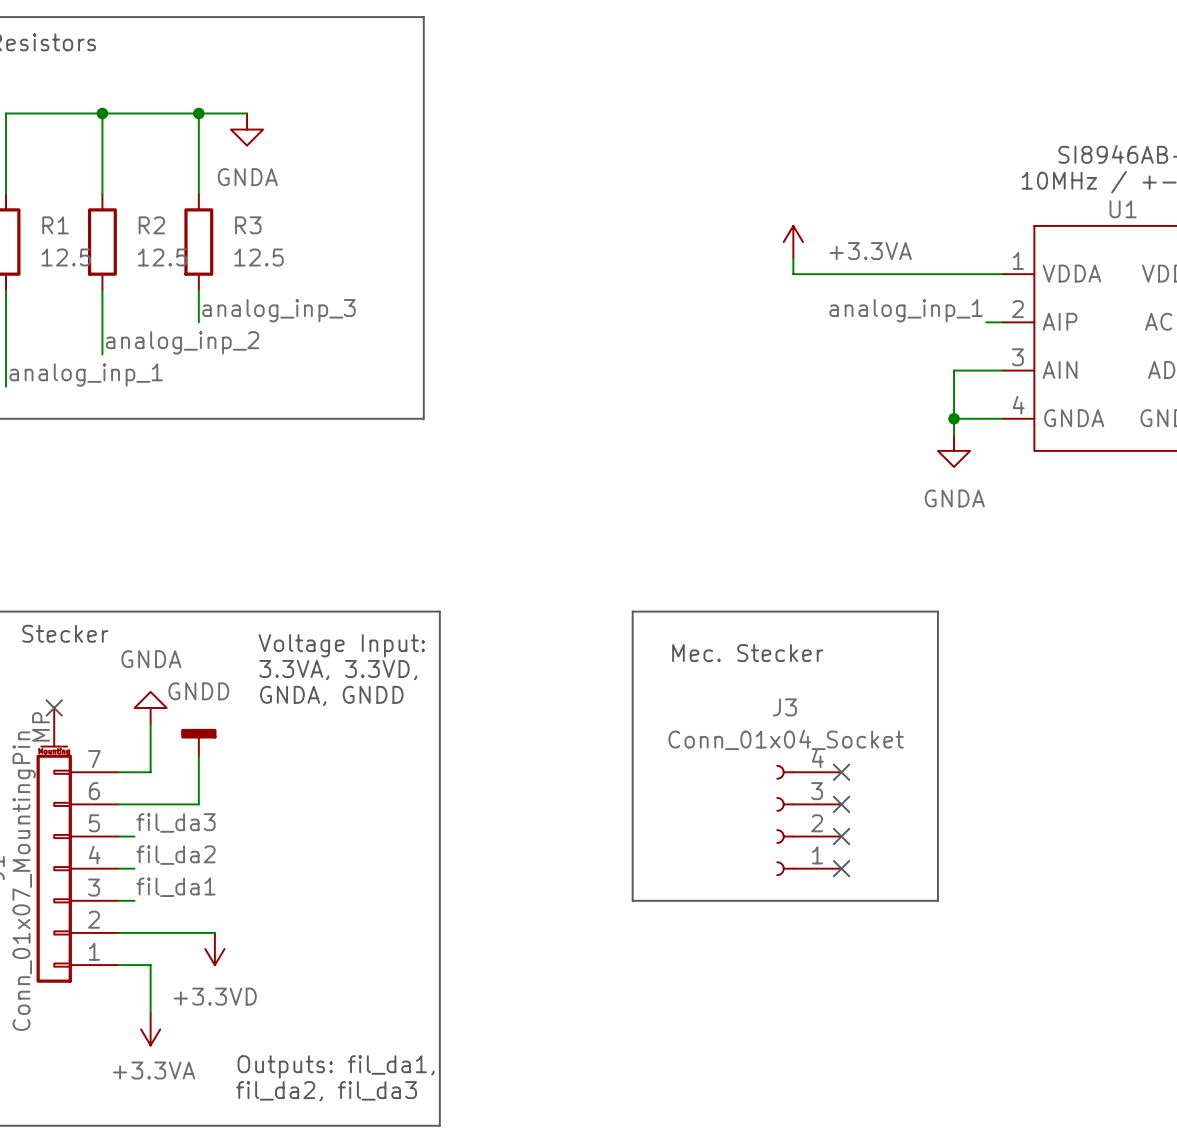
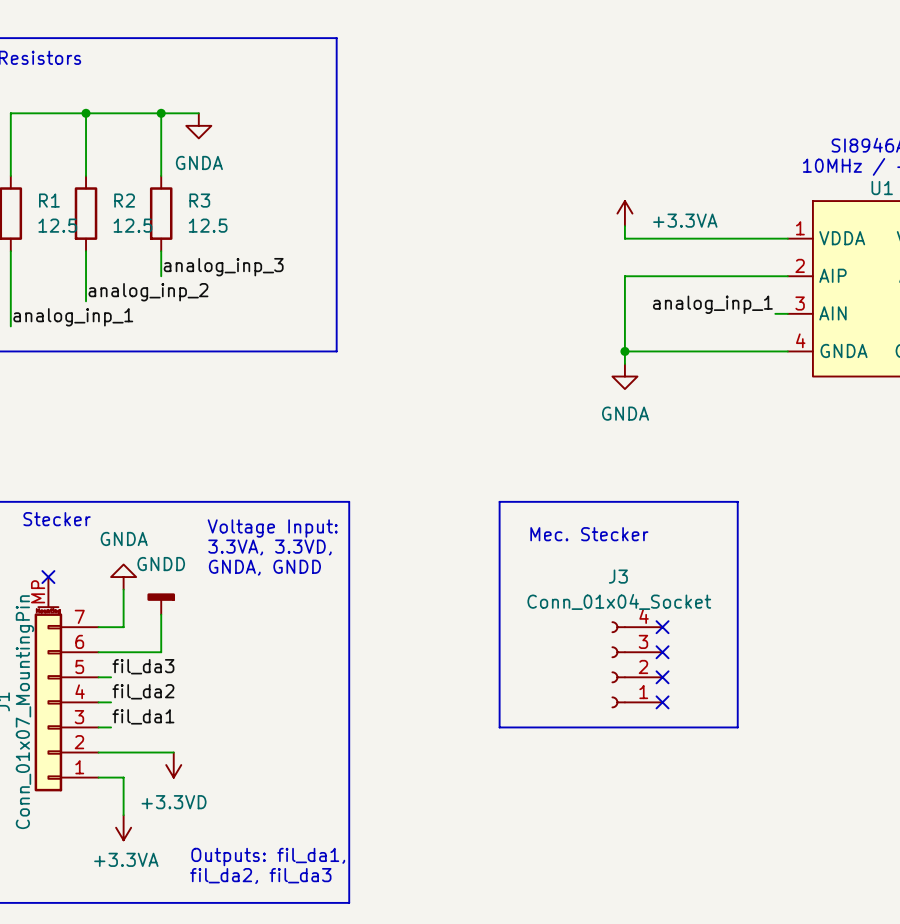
label position: analog_inp_1 (906, 310) -> analog_inp_1 (712, 304)
wire: none -> (775, 276) (624, 276) (624, 363)
wire: (986, 370) (954, 370) (954, 434) -> none
wire: none -> (624, 351) (750, 351)
junction: none -> (624, 351)
junction: (954, 418) -> none
power symbol position: GNDA (954, 450) -> GNDA (624, 376)

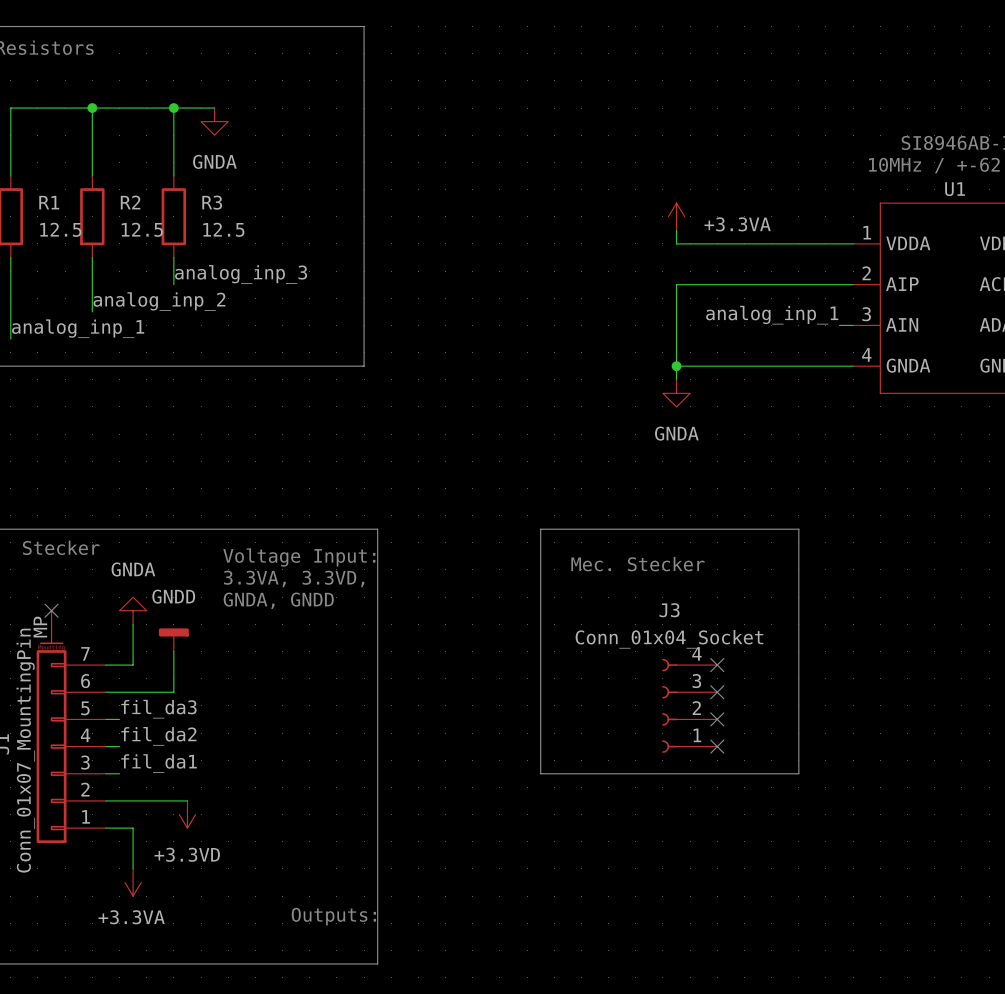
text: Outputs: fil_da1, (268, 857) -> Outputs: (333, 916)
text: fil_da2, fil_da3 (260, 875) -> none

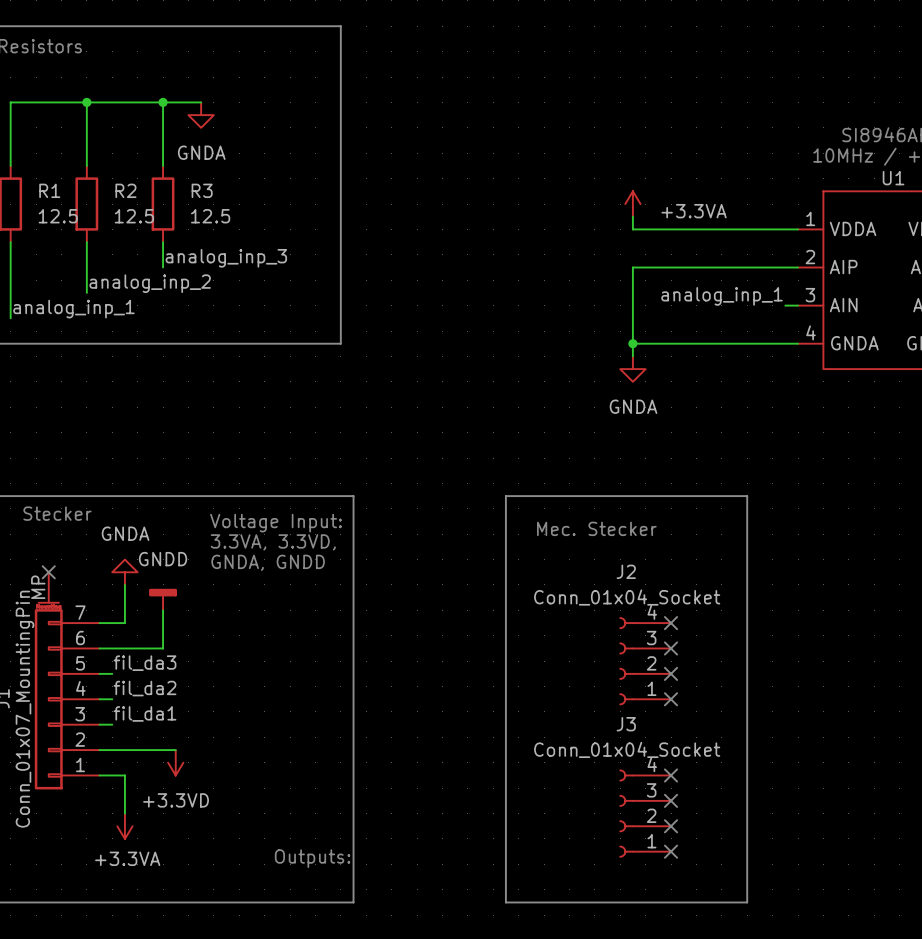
J3 name: J3 (669, 610) -> J2 (626, 571)
line: (540, 773) (798, 773) -> (505, 724) (505, 902) (747, 902) (747, 724)
no-connect mark: none -> (671, 775)
no-connect mark: none -> (671, 800)
J3: none -> Conn_01x04_Socket (645, 813)
no-connect mark: none -> (671, 826)
no-connect mark: none -> (671, 851)

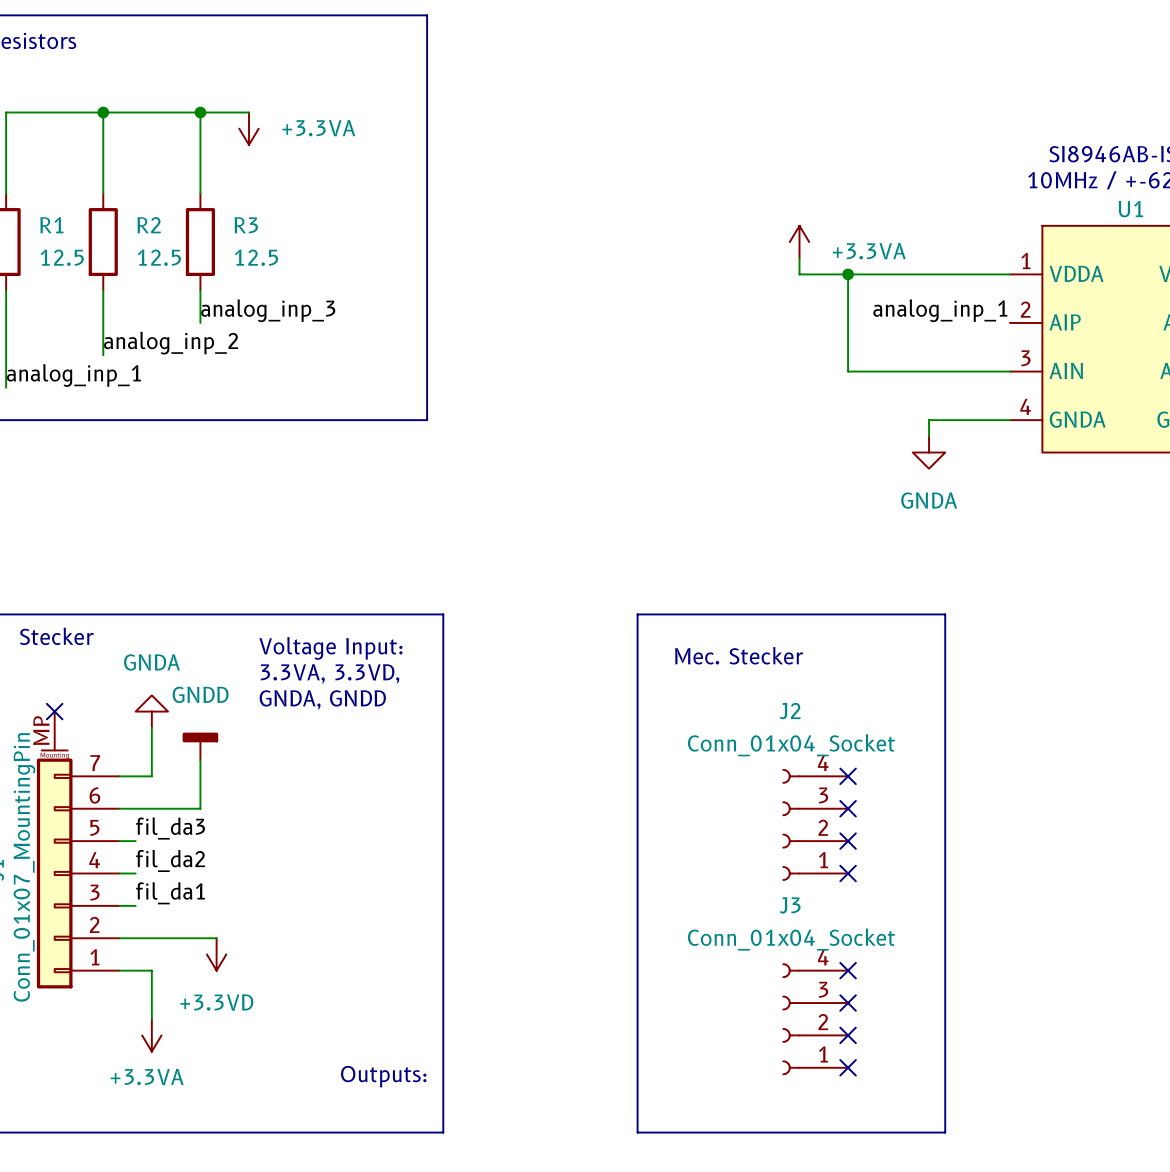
power symbol: GNDA (201, 115) -> +3.3VA (248, 128)
wire: none -> (848, 274) (848, 371) (993, 371)
junction: none -> (848, 274)
wire: (798, 267) (632, 267) (632, 356) -> none
label position: analog_inp_1 (722, 296) -> analog_inp_1 (940, 310)
wire: (632, 343) (734, 343) -> (929, 436) (929, 420)
junction: (632, 343) -> none
power symbol position: GNDA (632, 369) -> GNDA (929, 452)

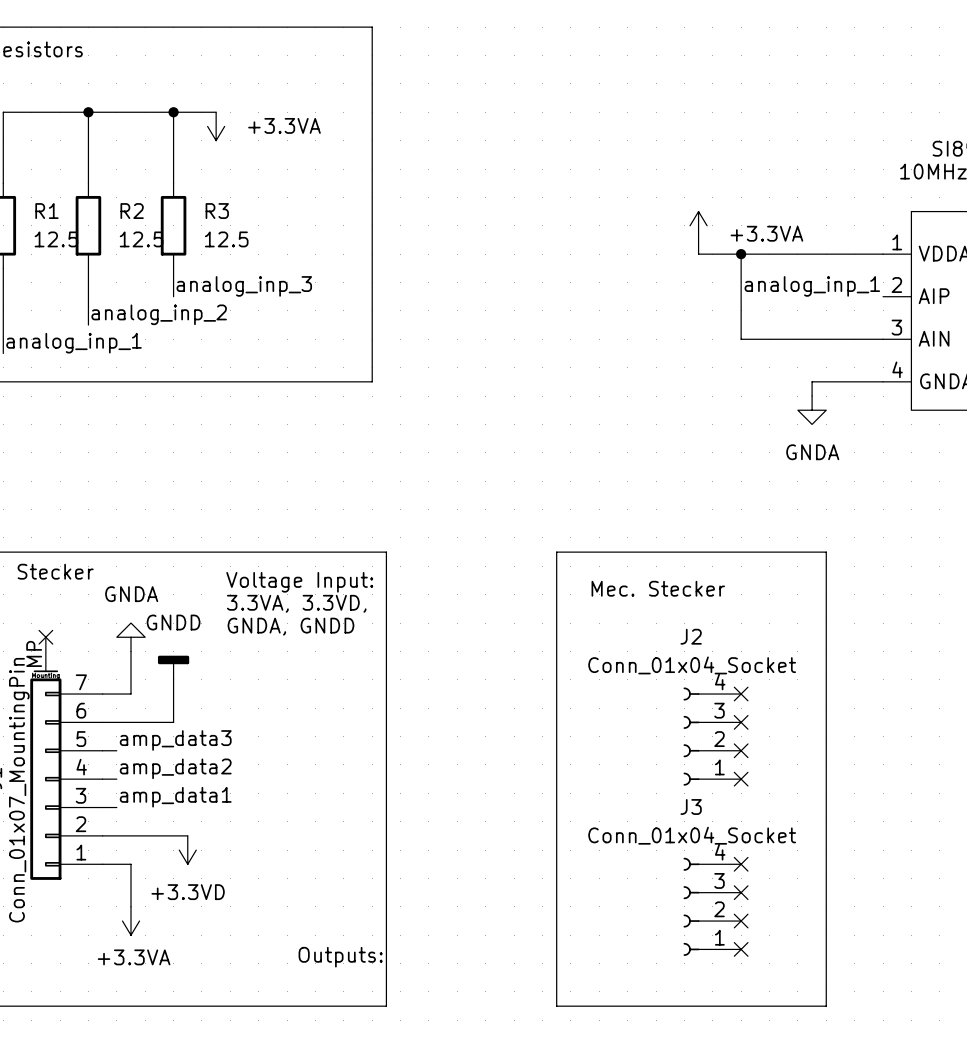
label: fil_da3 (170, 828) -> amp_data3 (175, 740)
label: fil_da2 (170, 860) -> amp_data2 (175, 768)
label: fil_da1 (170, 893) -> amp_data1 (175, 797)

